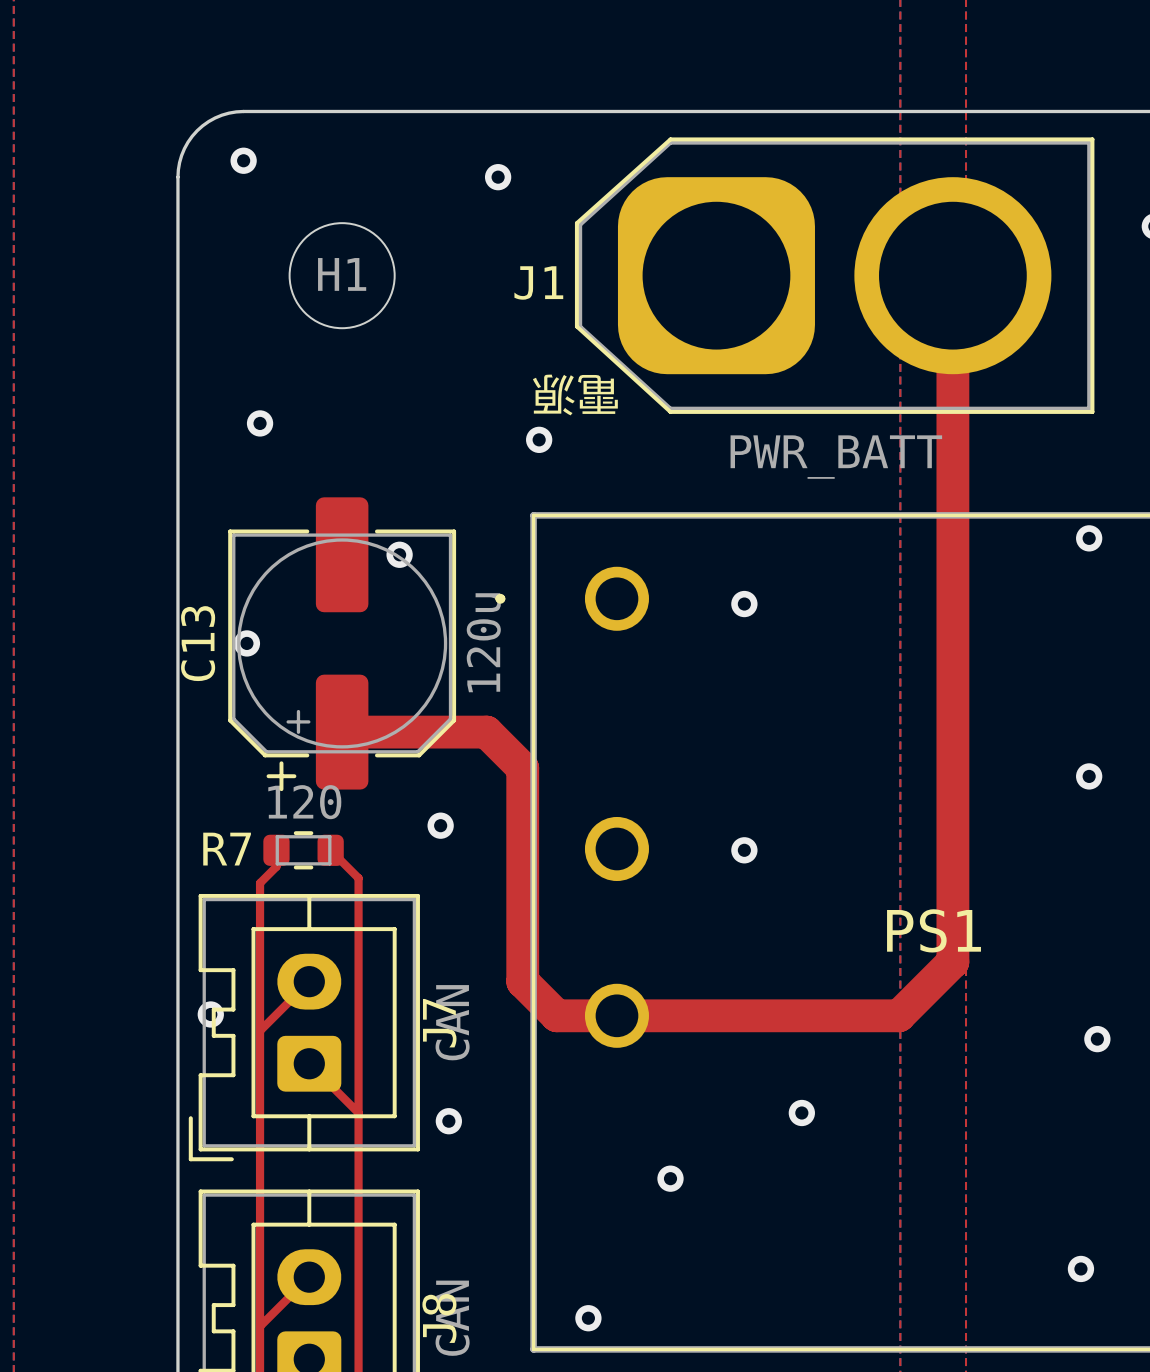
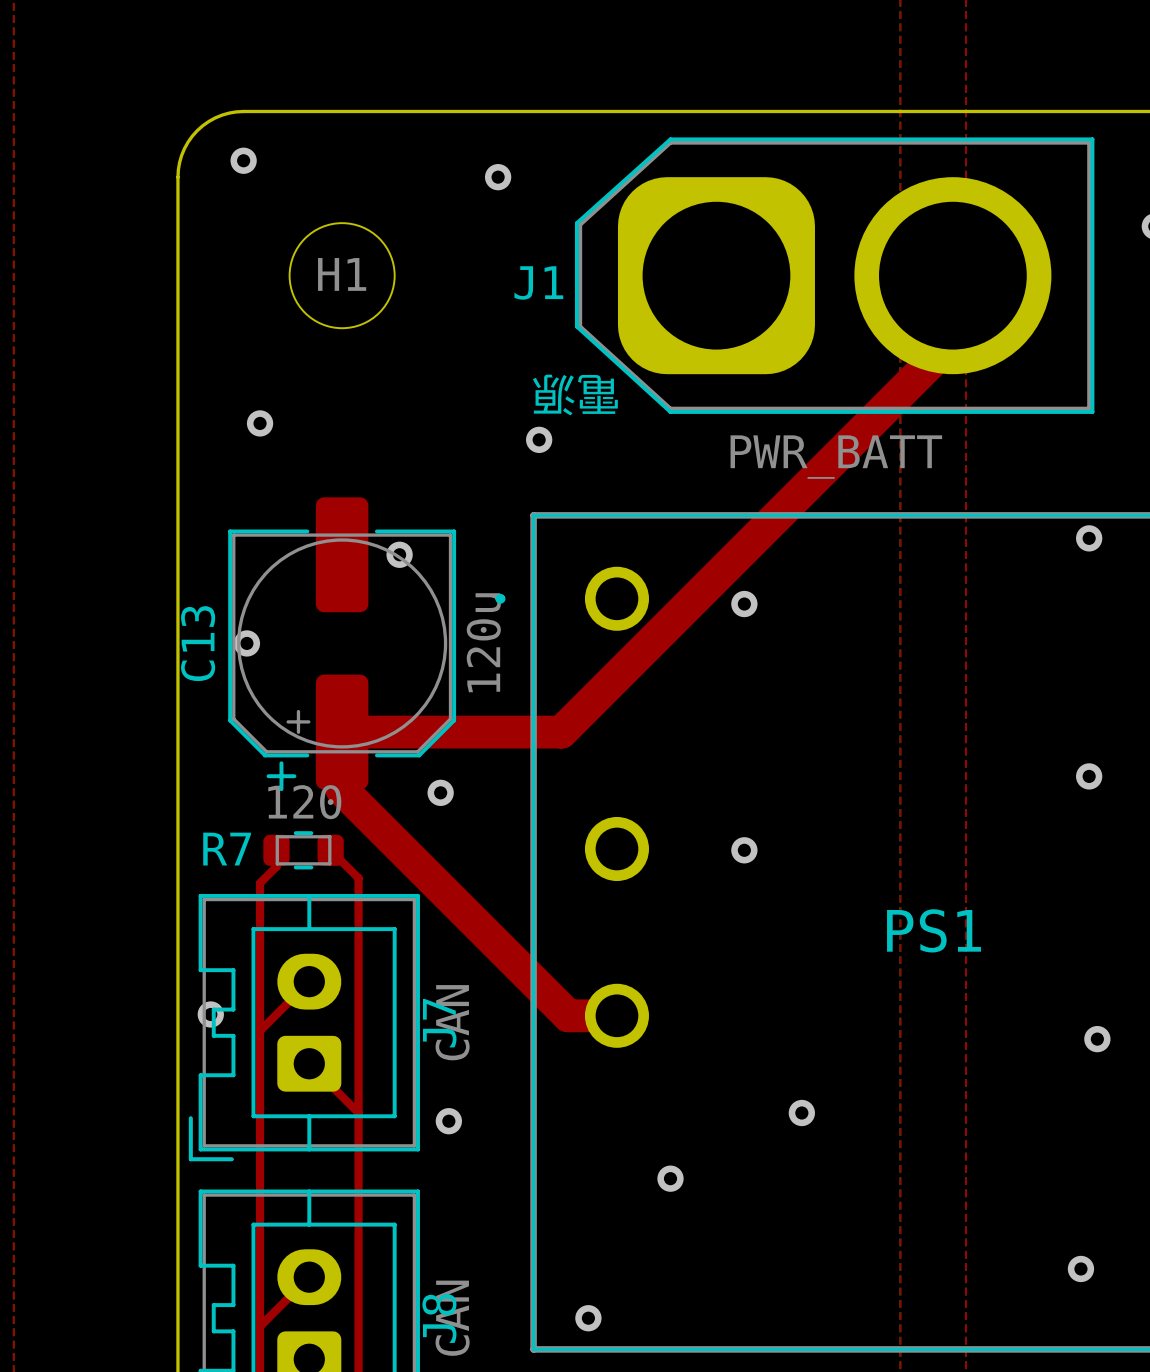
top track: (952, 340) (952, 961) (899, 1015) (616, 1015) -> (952, 340) (561, 732) (486, 732)
top track: (486, 732) (522, 768) (522, 981) (556, 1015) (568, 1015) -> (342, 732) (342, 789) (568, 1015)
via position: (440, 825) -> (440, 792)

